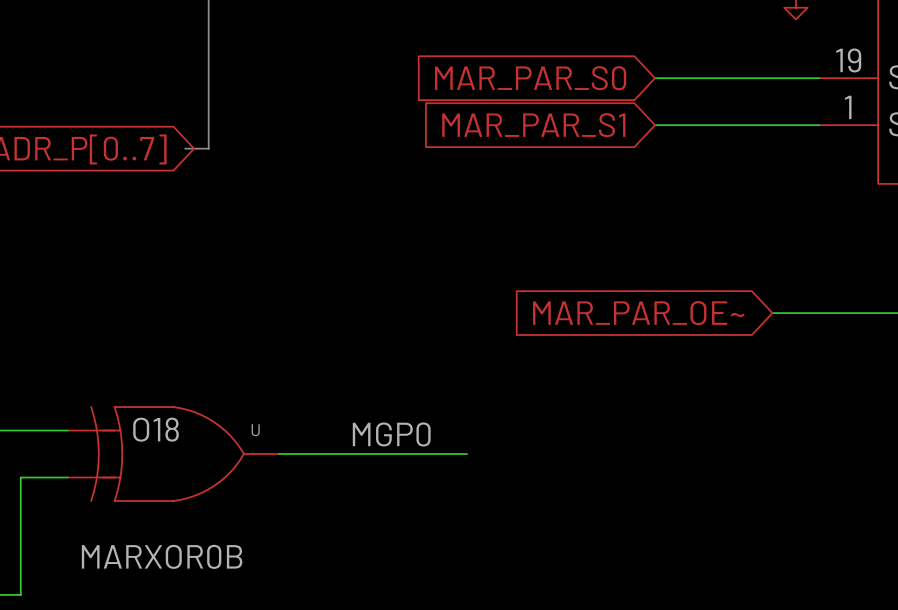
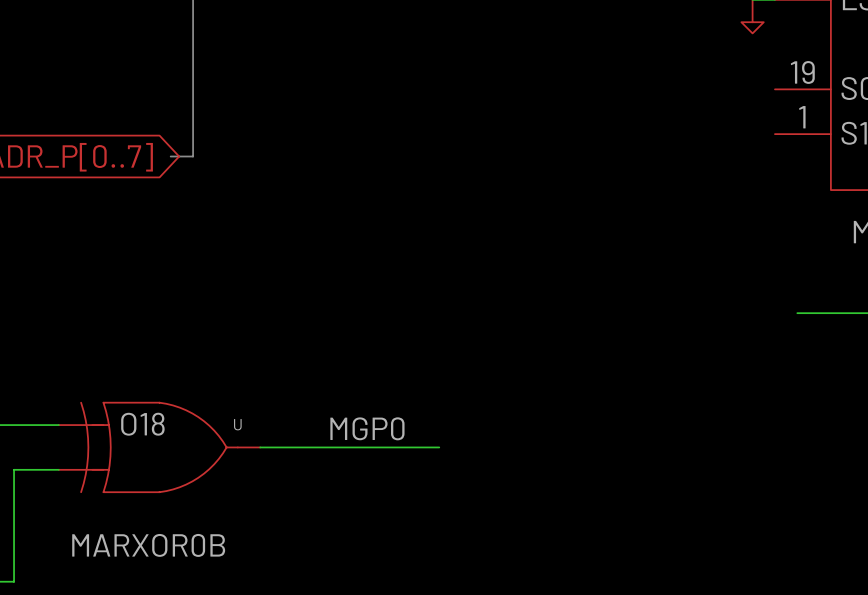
global label: MAR_PAR_S0 (530, 78) -> none
wire: (654, 78) (819, 78) -> none
global label: MAR_PAR_S1 (533, 125) -> none
wire: (654, 125) (819, 125) -> none
global label: MAR_PAR_OE~ (638, 313) -> none
wire: (772, 313) (842, 313) -> none

